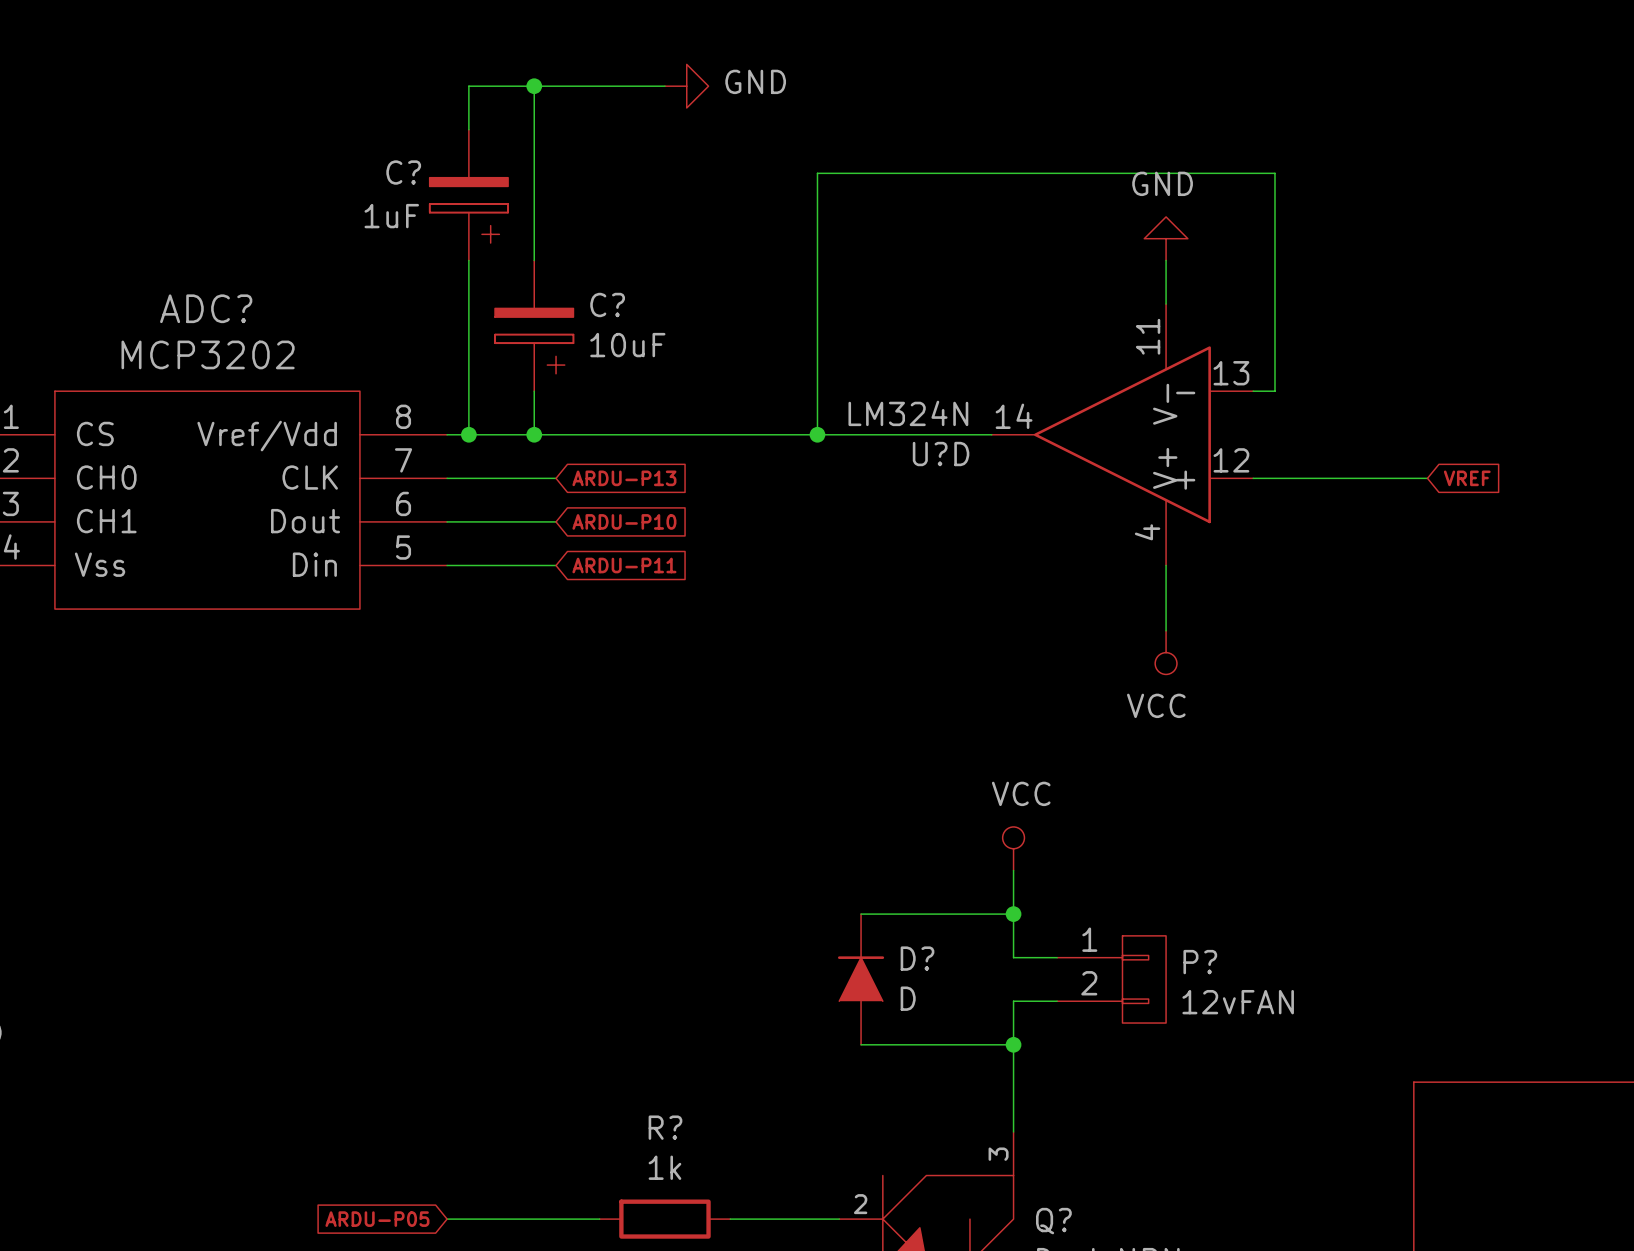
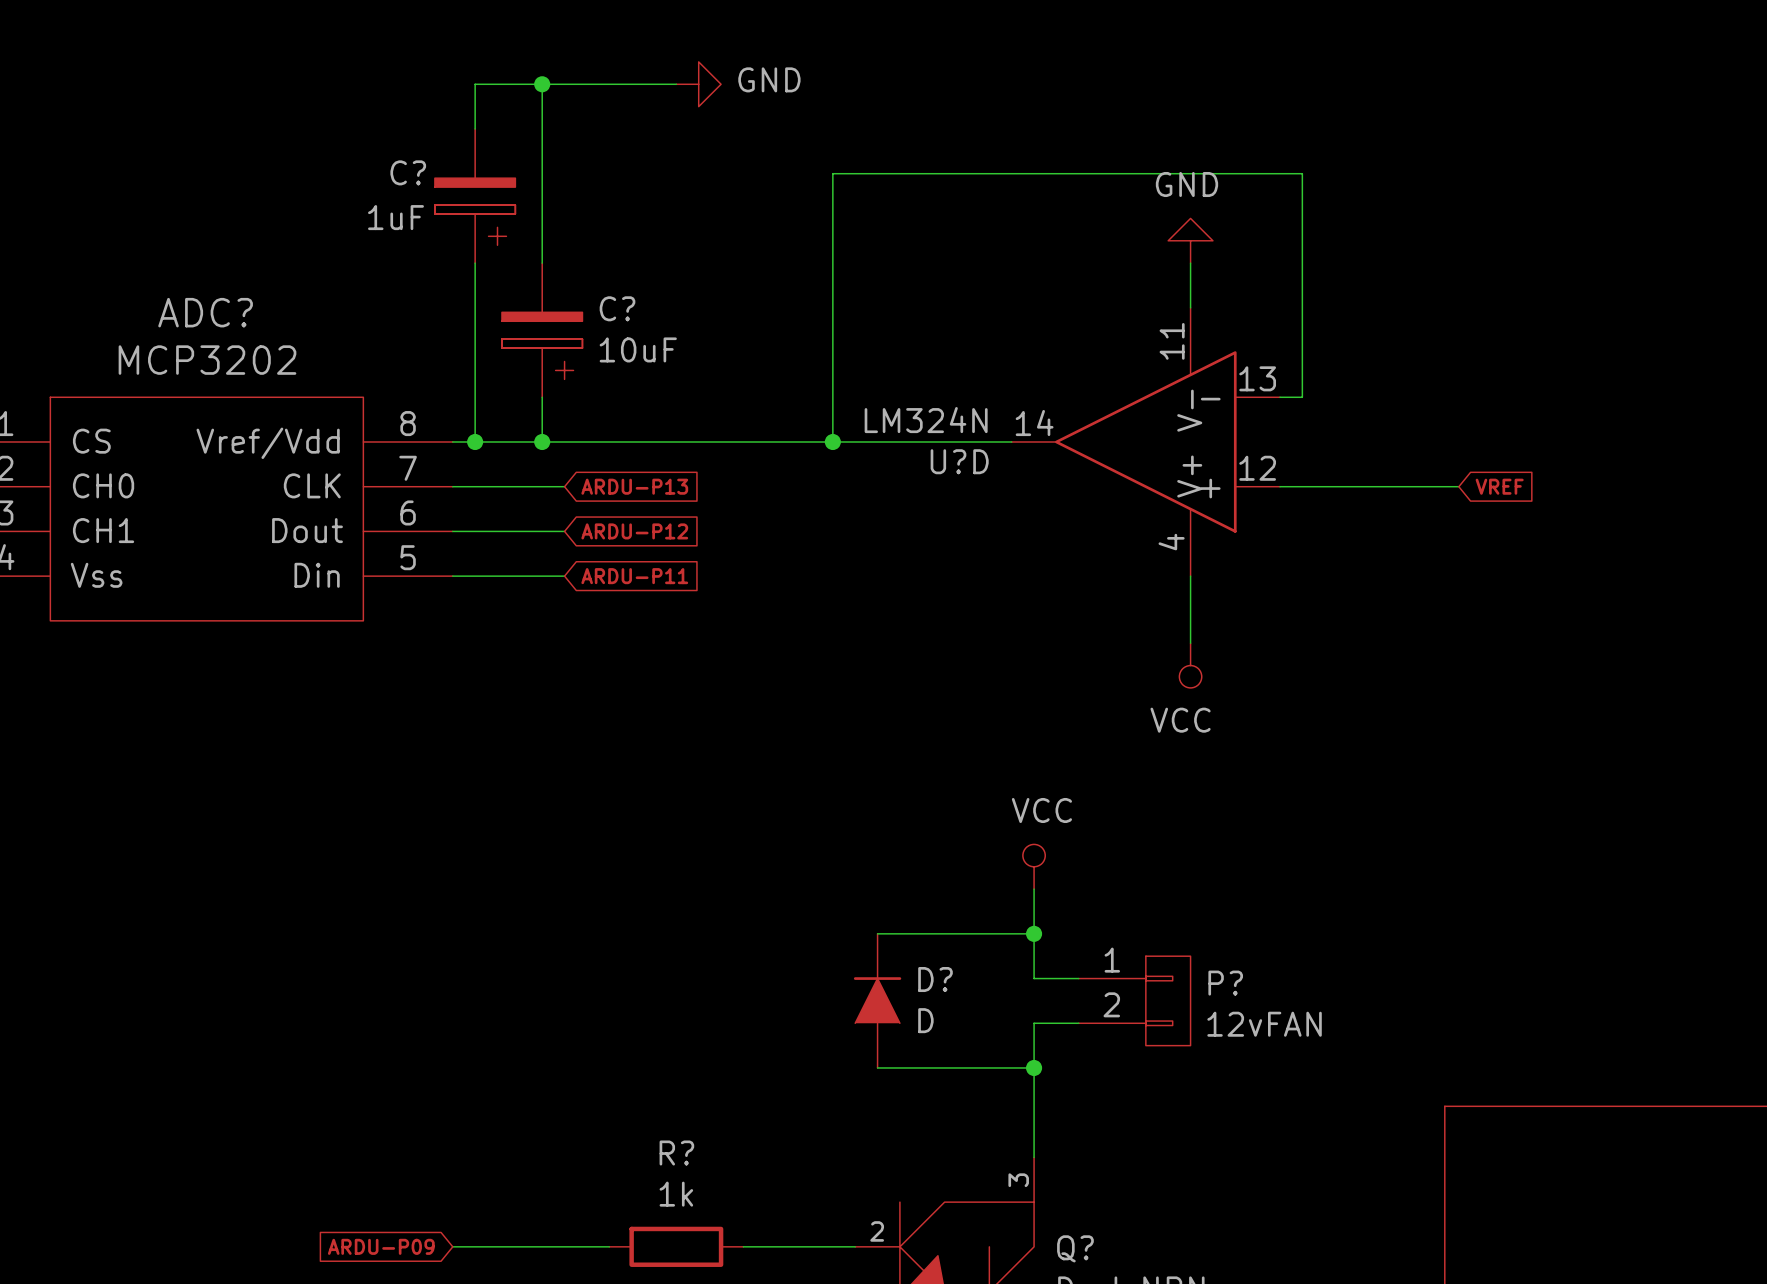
global label: ARDU-P10 (624, 521) -> ARDU-P12 (634, 531)
global label: ARDU-P05 (377, 1219) -> ARDU-P09 (381, 1246)

